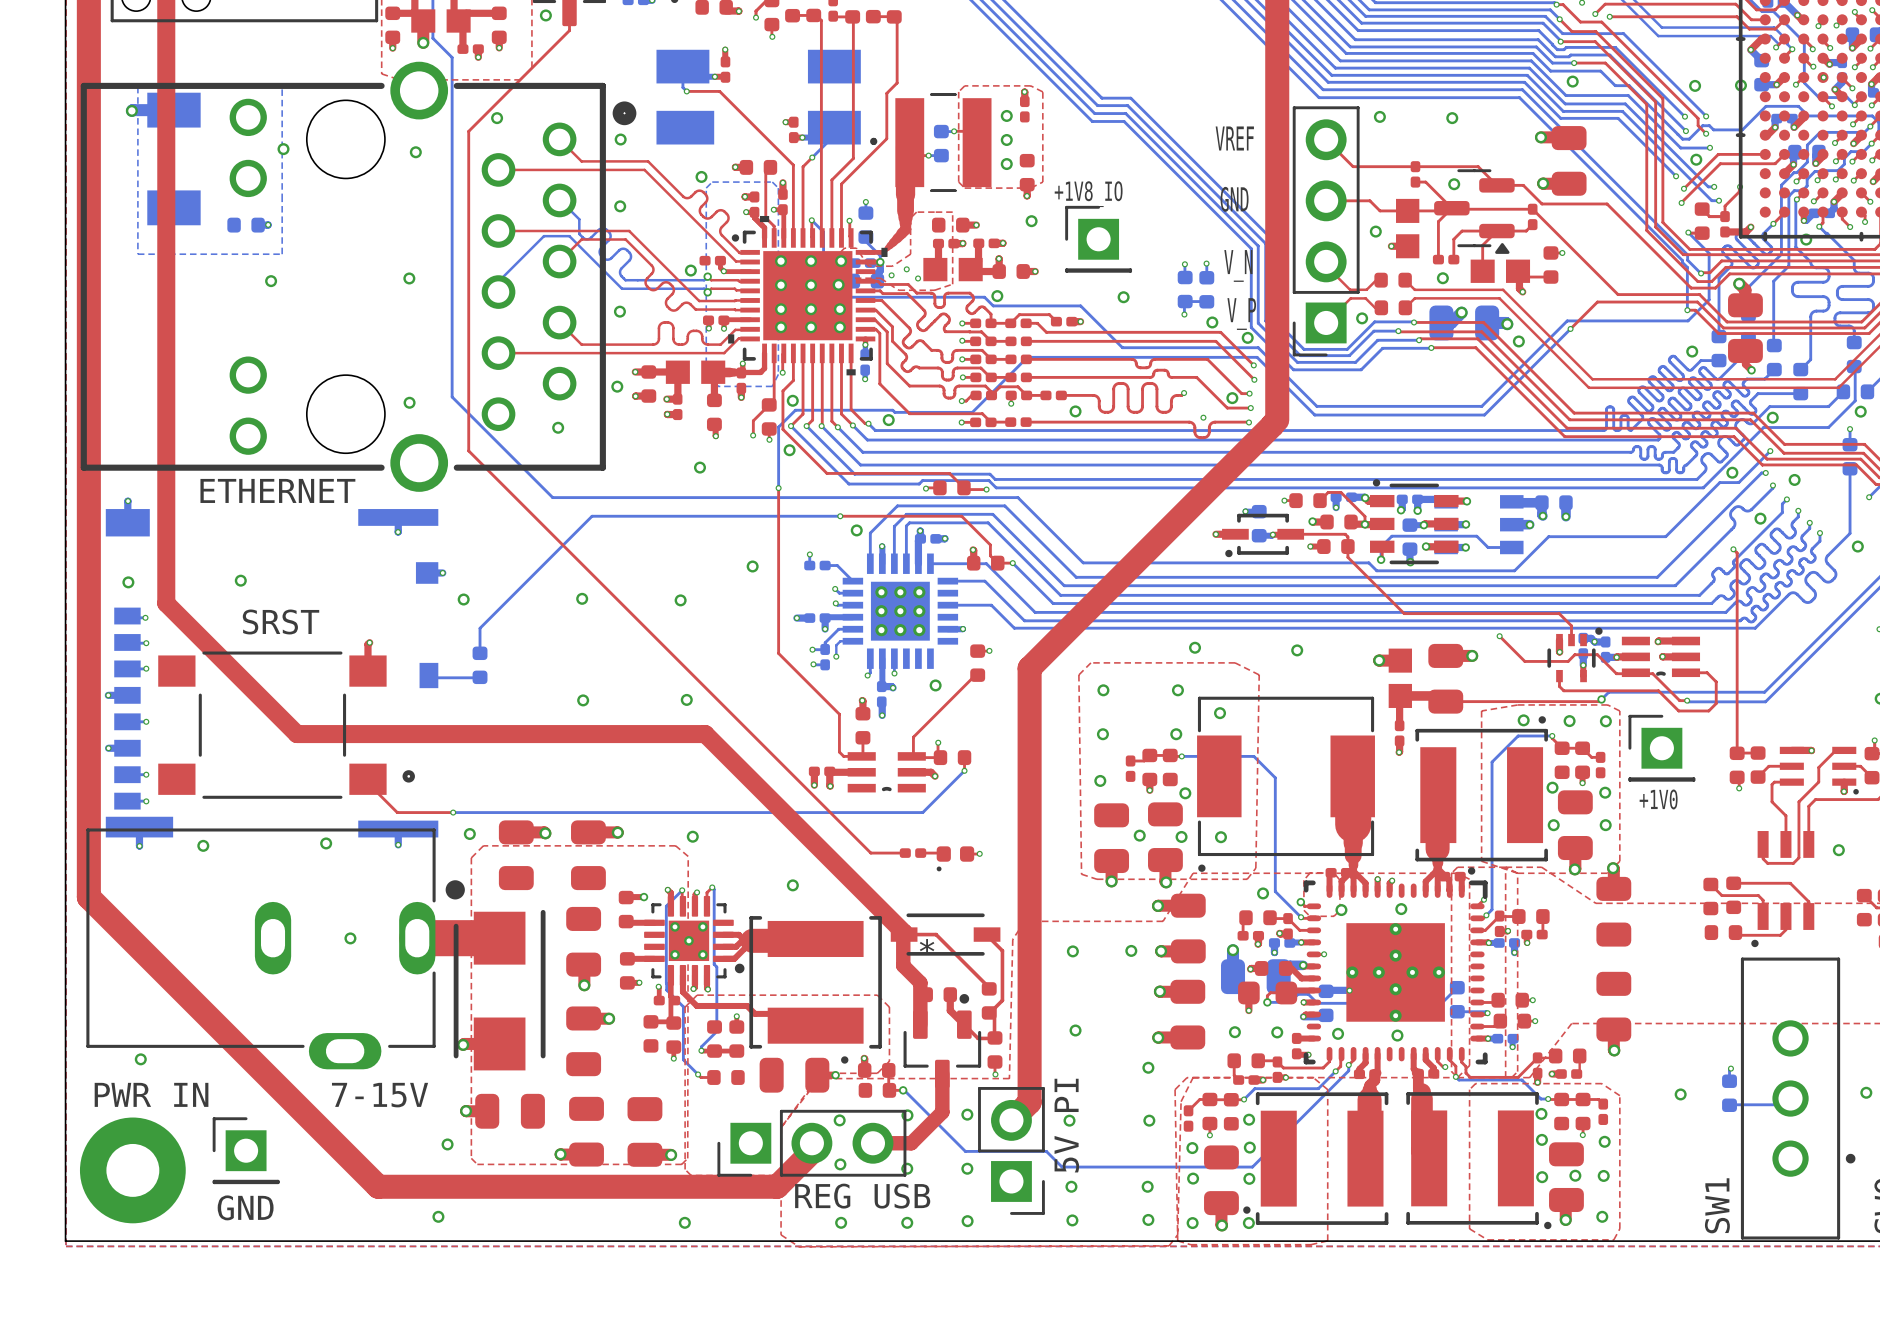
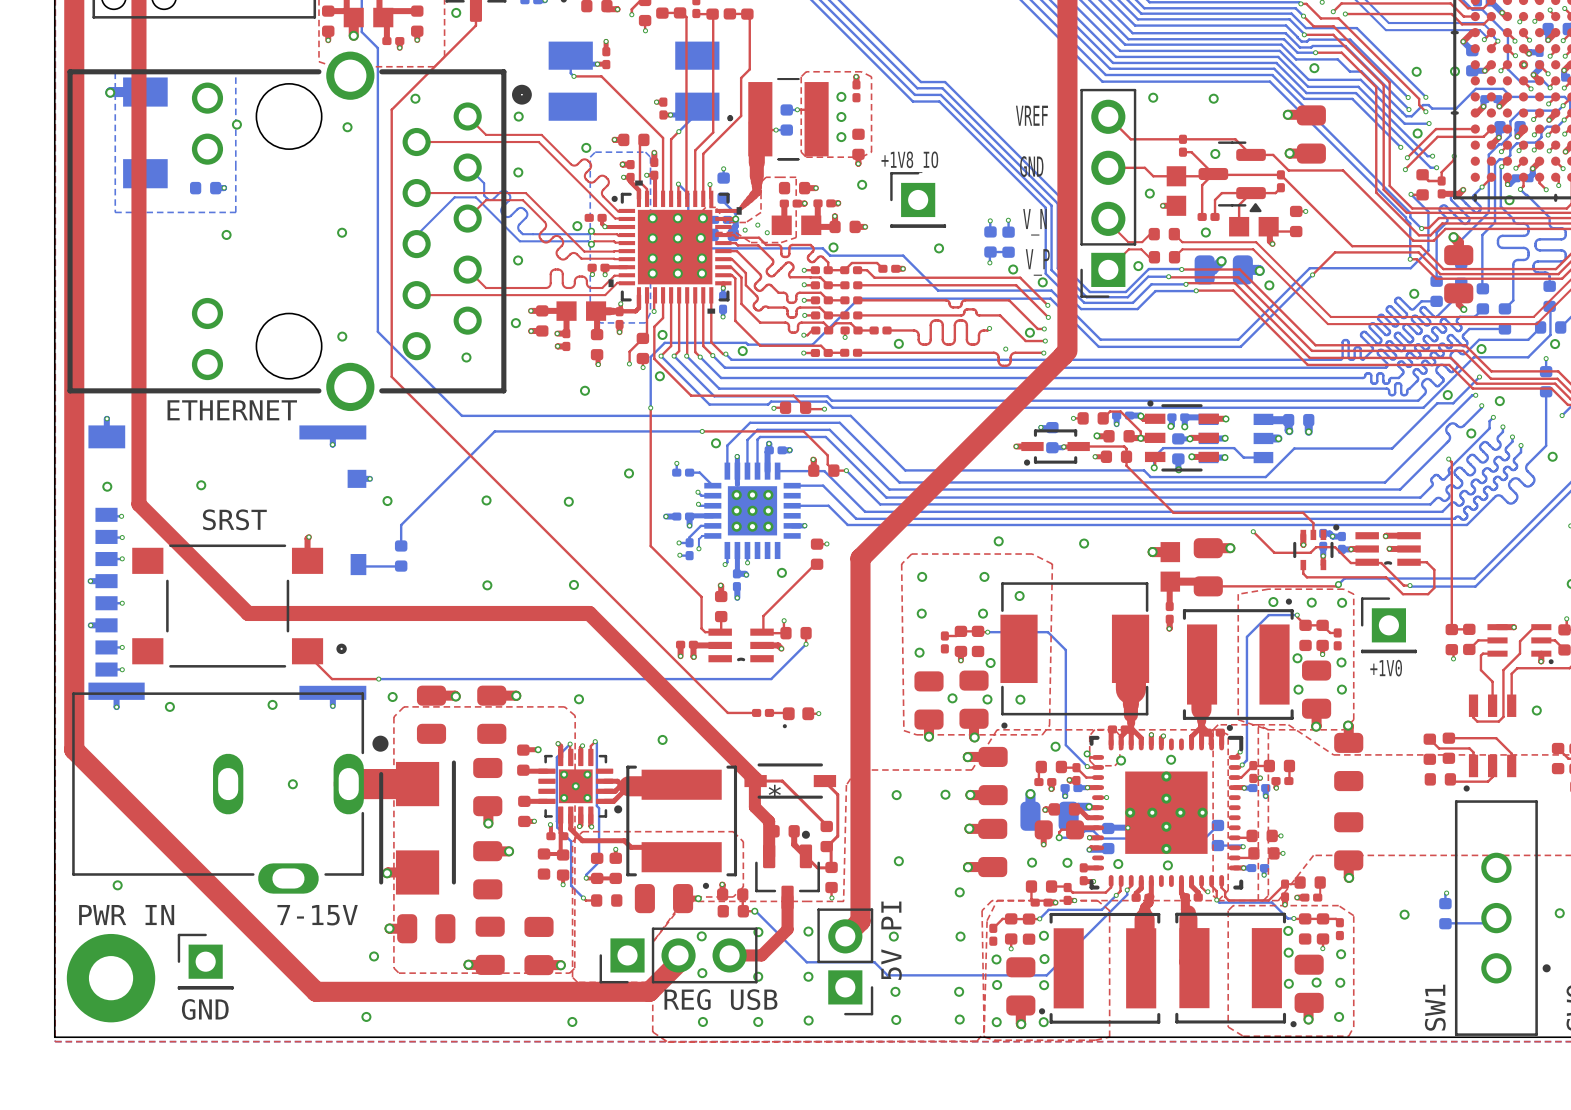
bottom track: none -> (737, 471) (737, 483)

